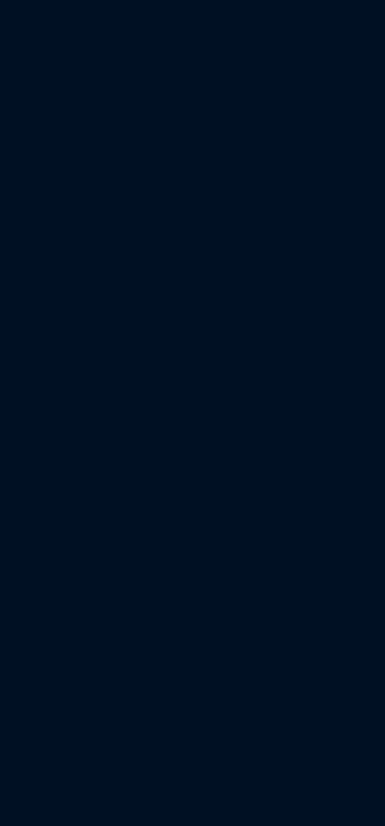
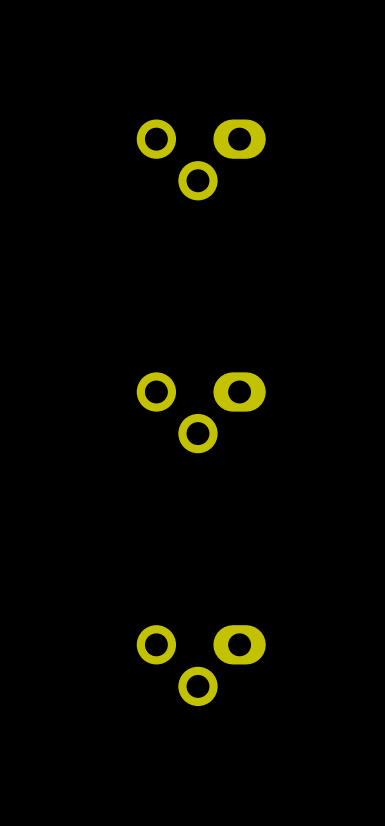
part: none -> (201, 159)
part: none -> (201, 412)
part: none -> (201, 665)

